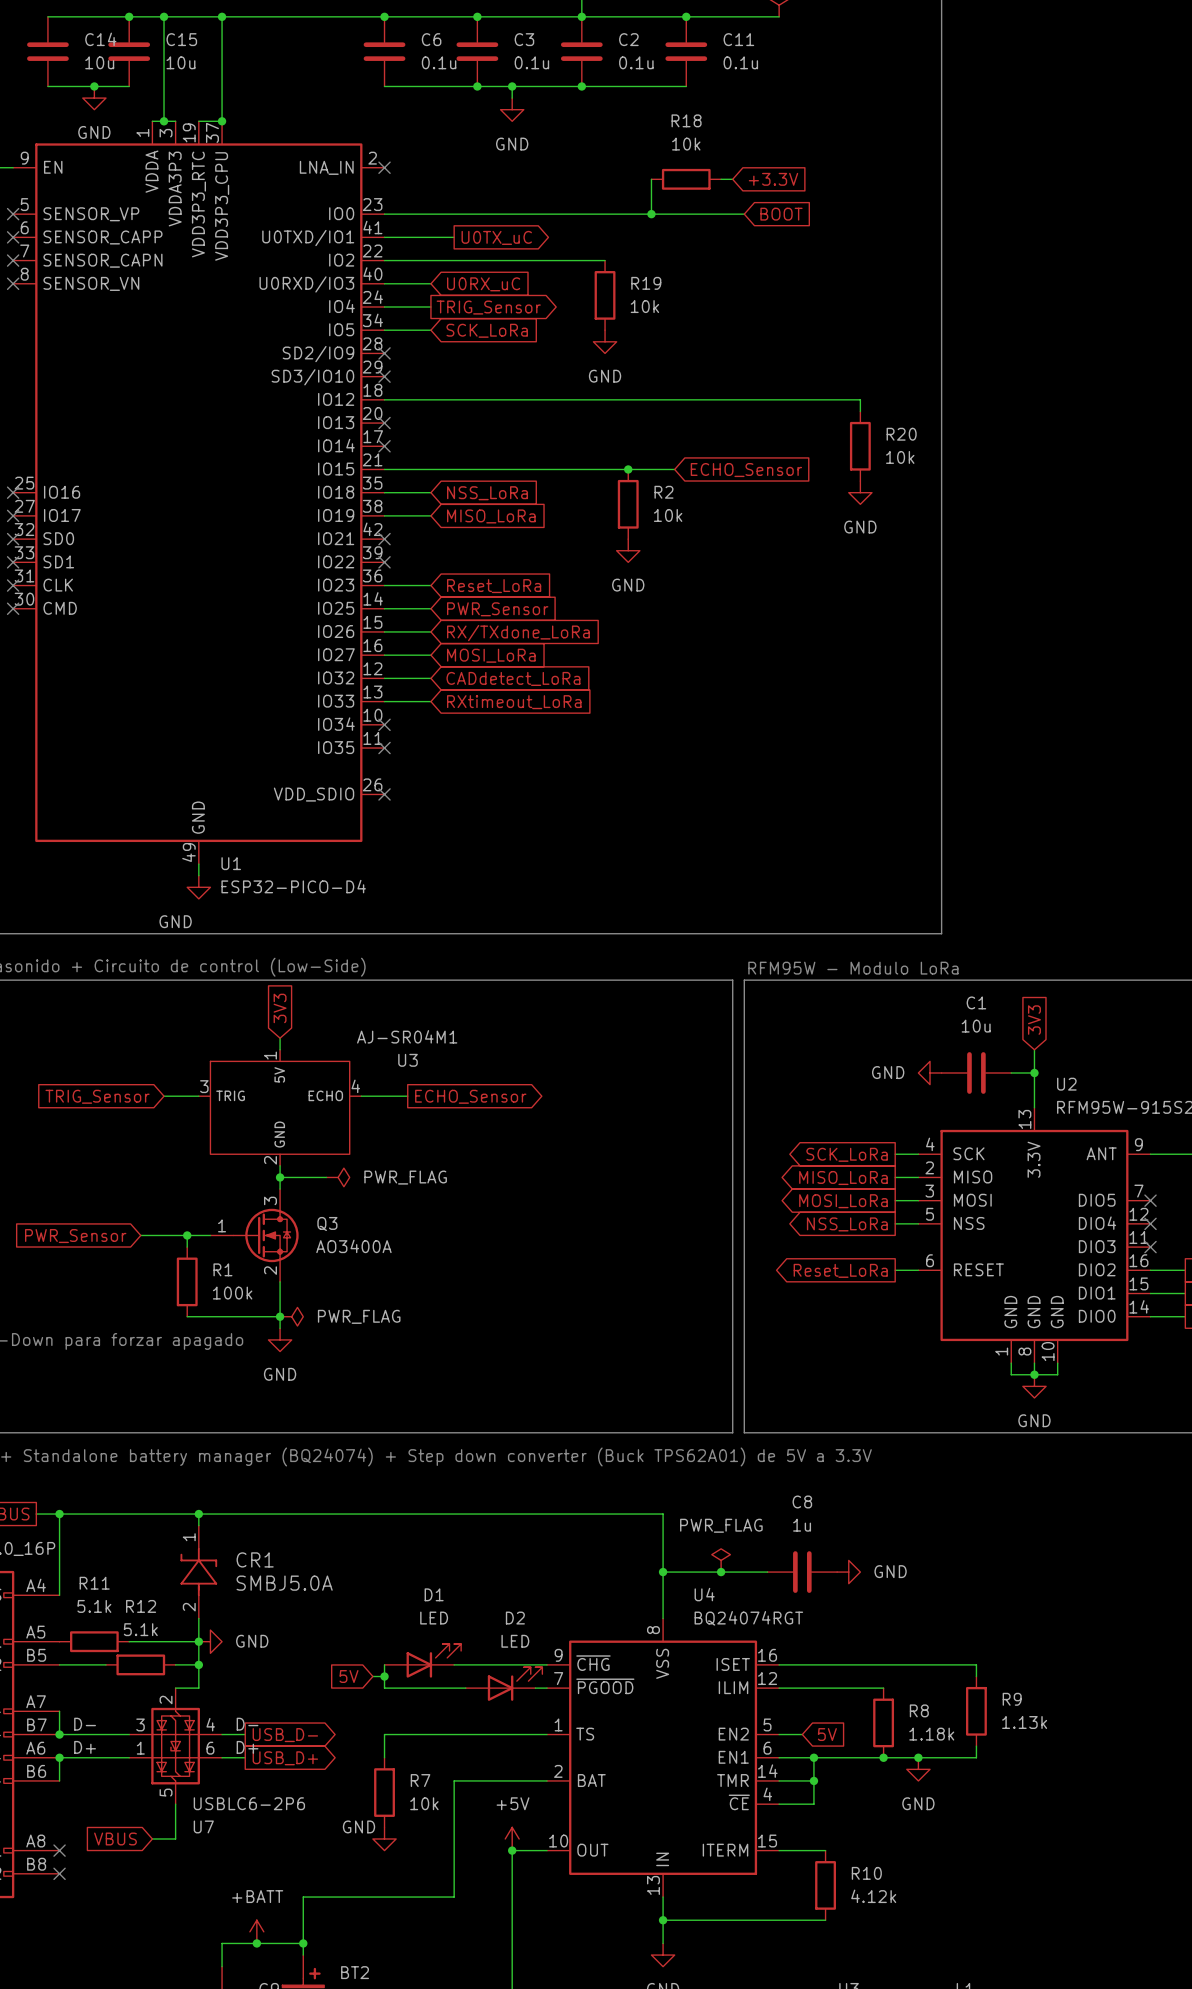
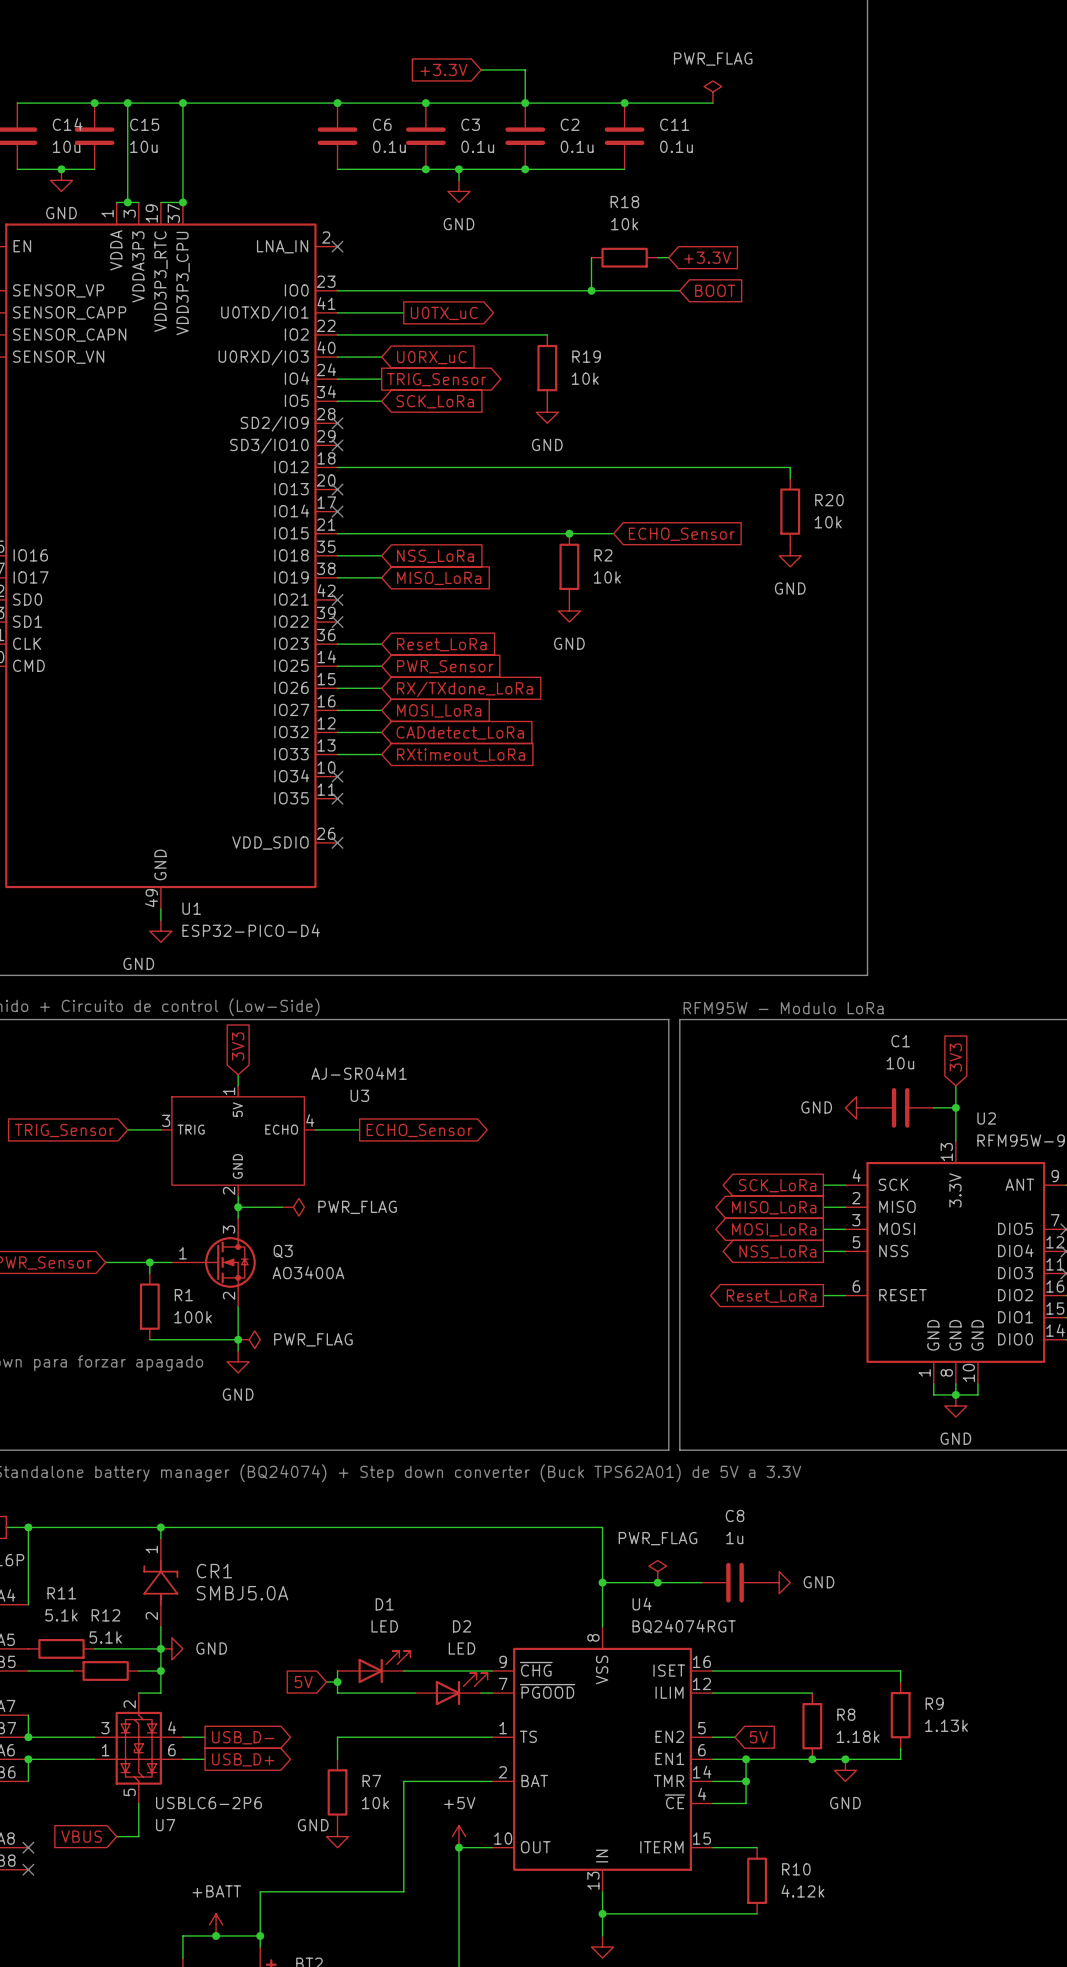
label: D- (85, 1724) -> none
label: D- (247, 1724) -> none
label: D+ (85, 1747) -> none
label: D+ (247, 1747) -> none

